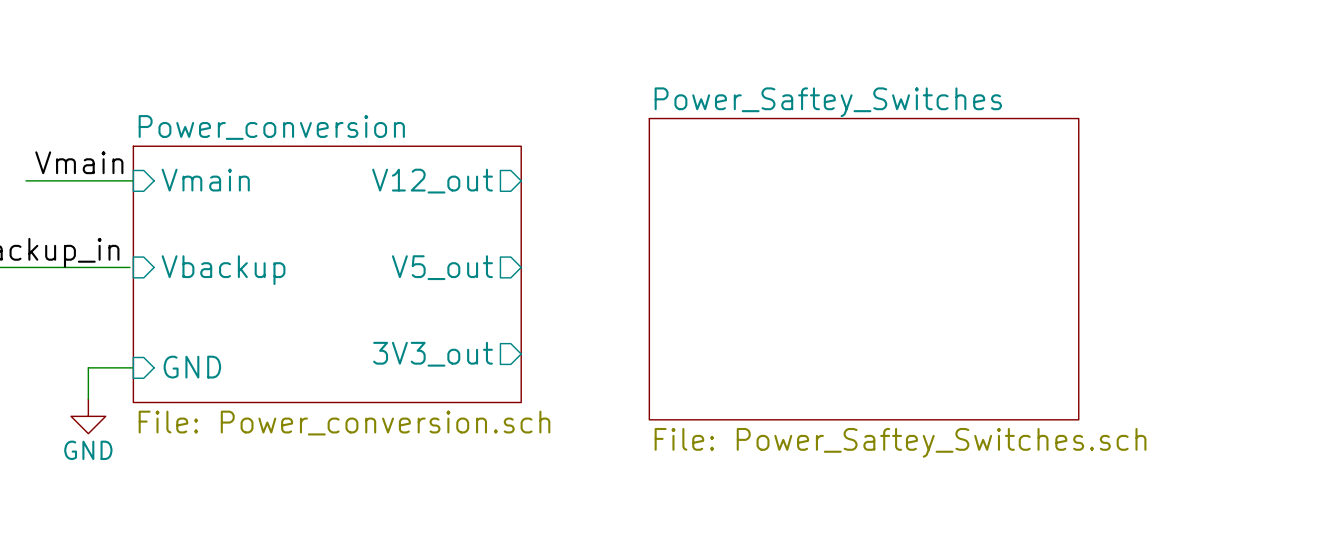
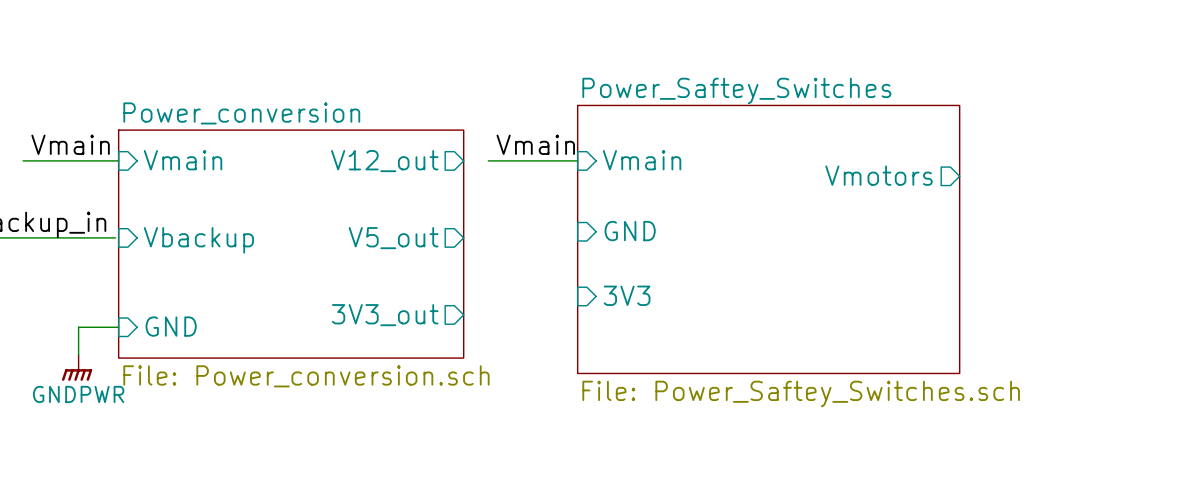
label: none -> Vmain (535, 144)
wire: none -> (488, 160) (577, 160)
sheet pin: none -> Vmain (642, 160)
sheet pin: none -> Vmotors (879, 175)
sheet pin: none -> GND (630, 231)
sheet pin: none -> 3V3 (627, 295)
power symbol: GND (88, 416) -> GNDPWR (77, 367)

